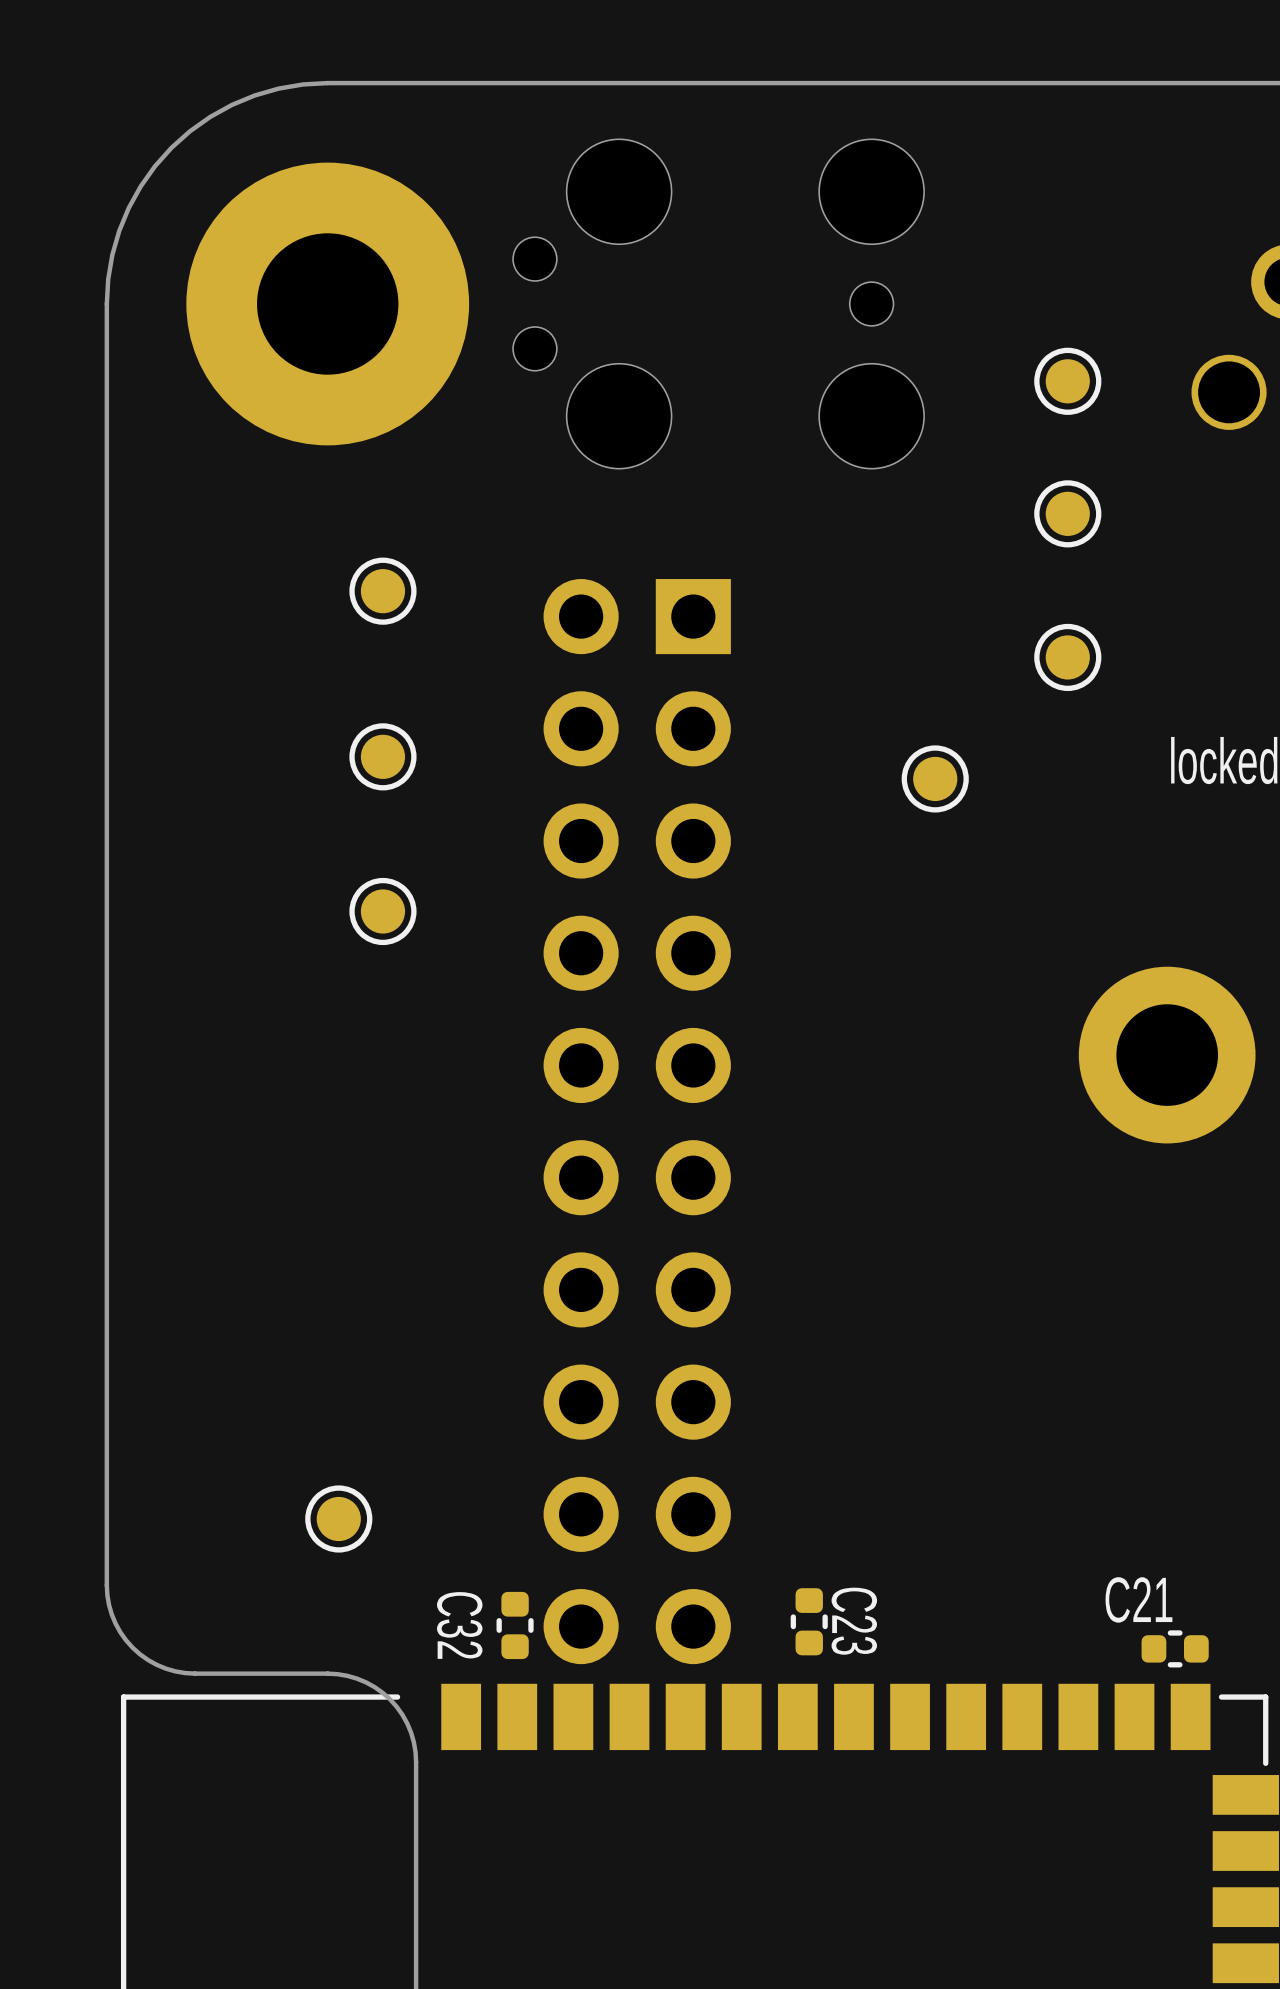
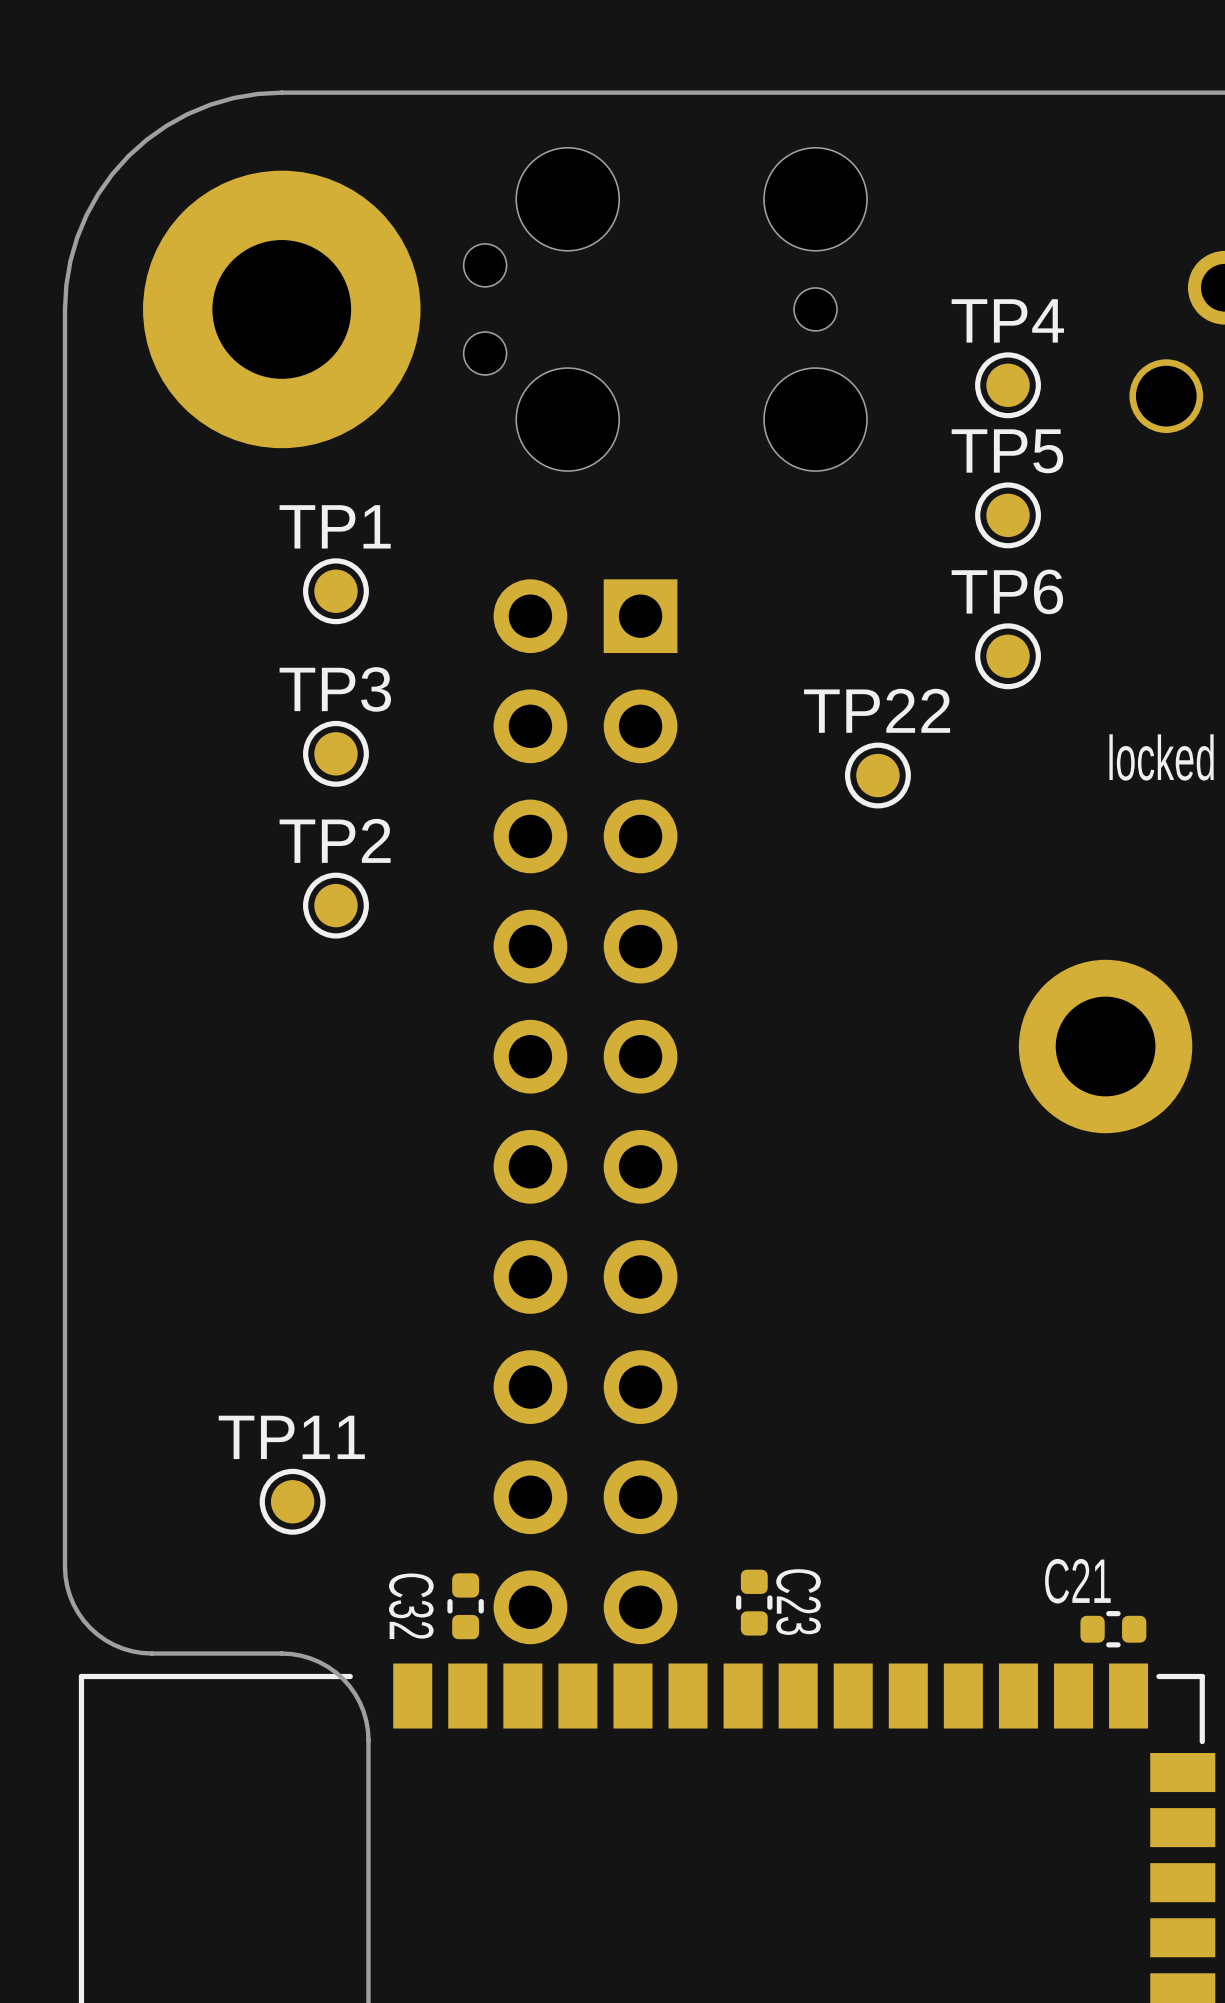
TP4 name: none -> TP4 (1007, 320)
TP5 name: none -> TP5 (1007, 451)
TP1 name: none -> TP1 (335, 526)
TP6 name: none -> TP6 (1007, 591)
TP3 name: none -> TP3 (335, 689)
TP22 name: none -> TP22 (877, 710)
TP2 name: none -> TP2 (335, 840)
TP11 name: none -> TP11 (291, 1437)

